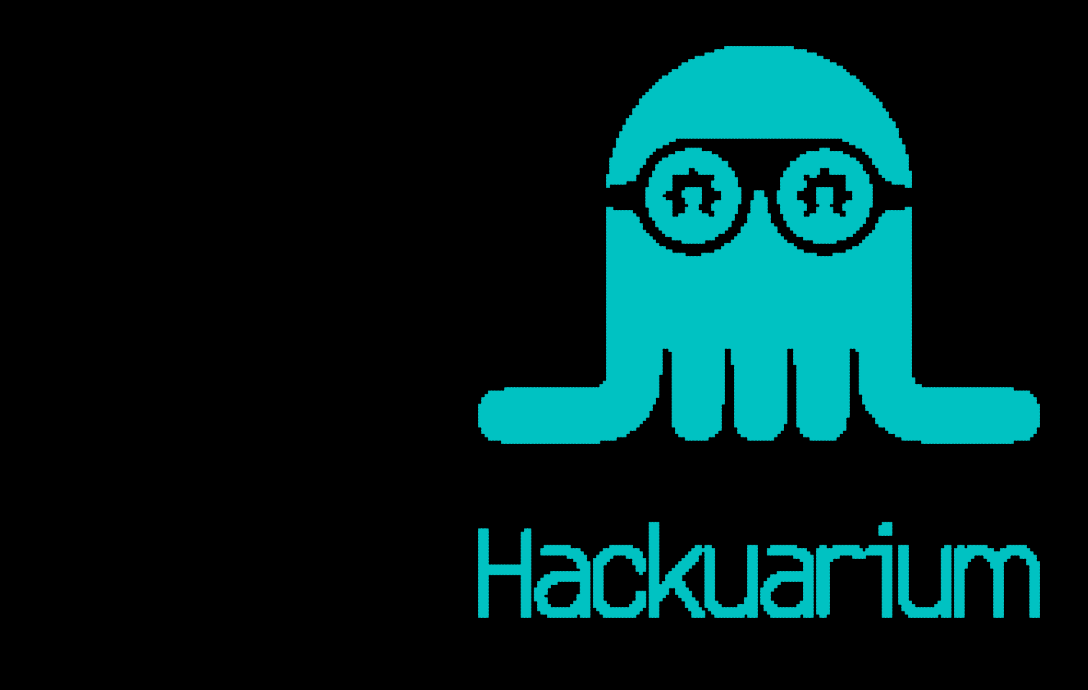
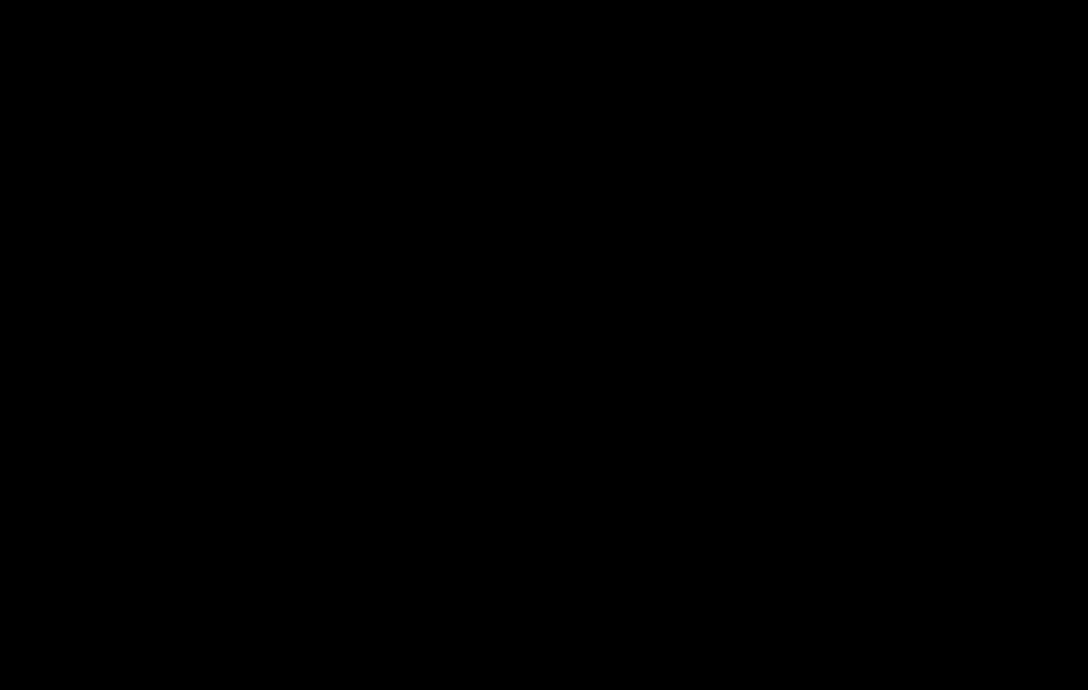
drawing: [478, 46, 1040, 618] -> none

